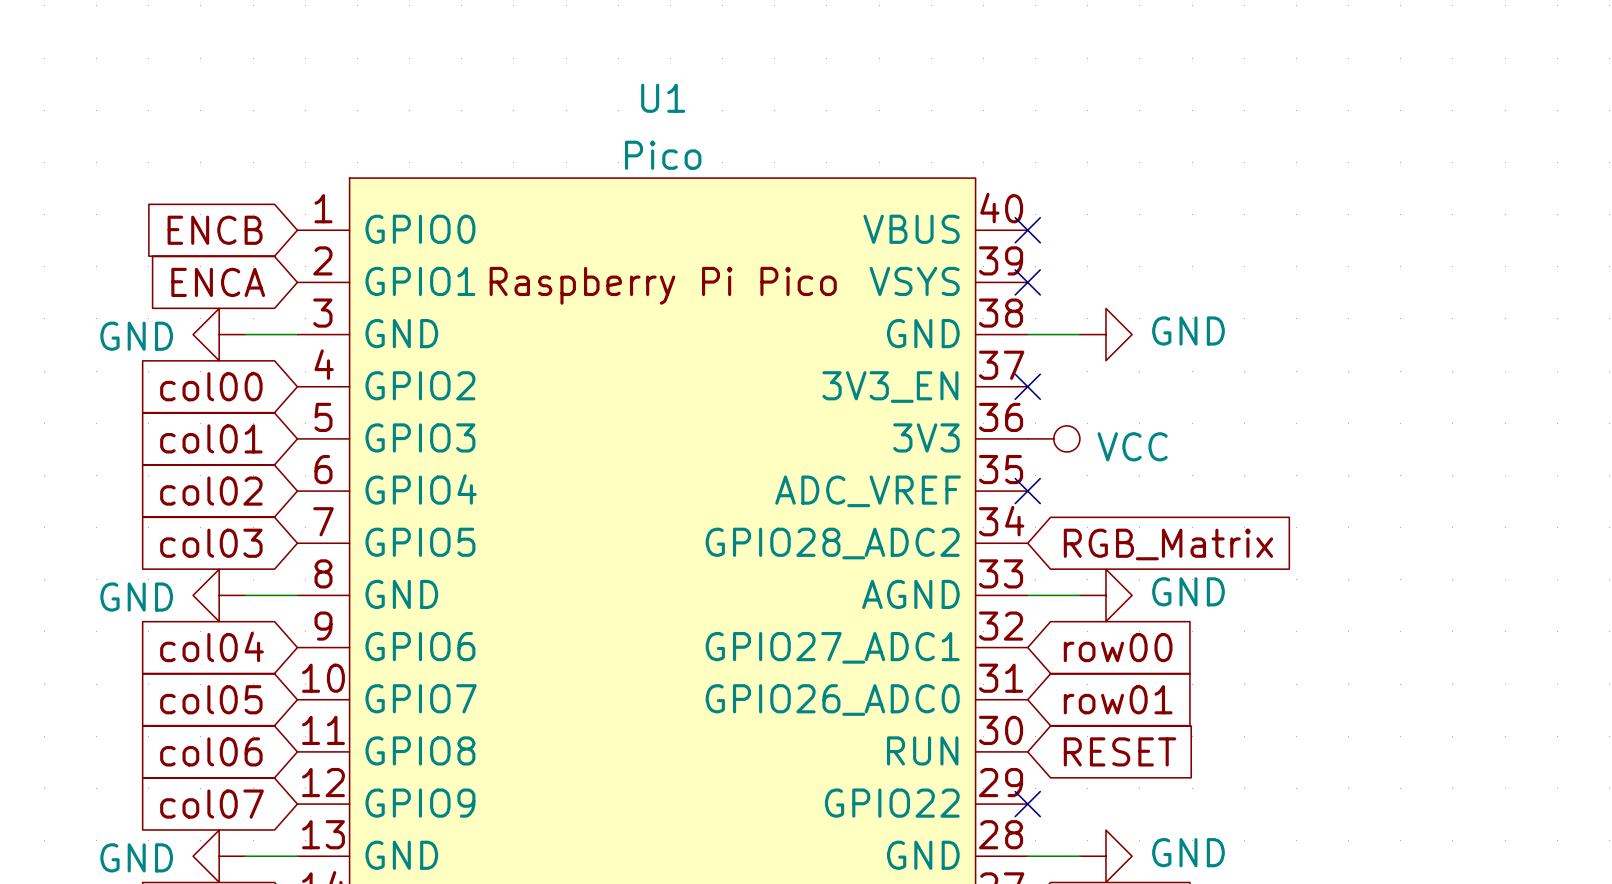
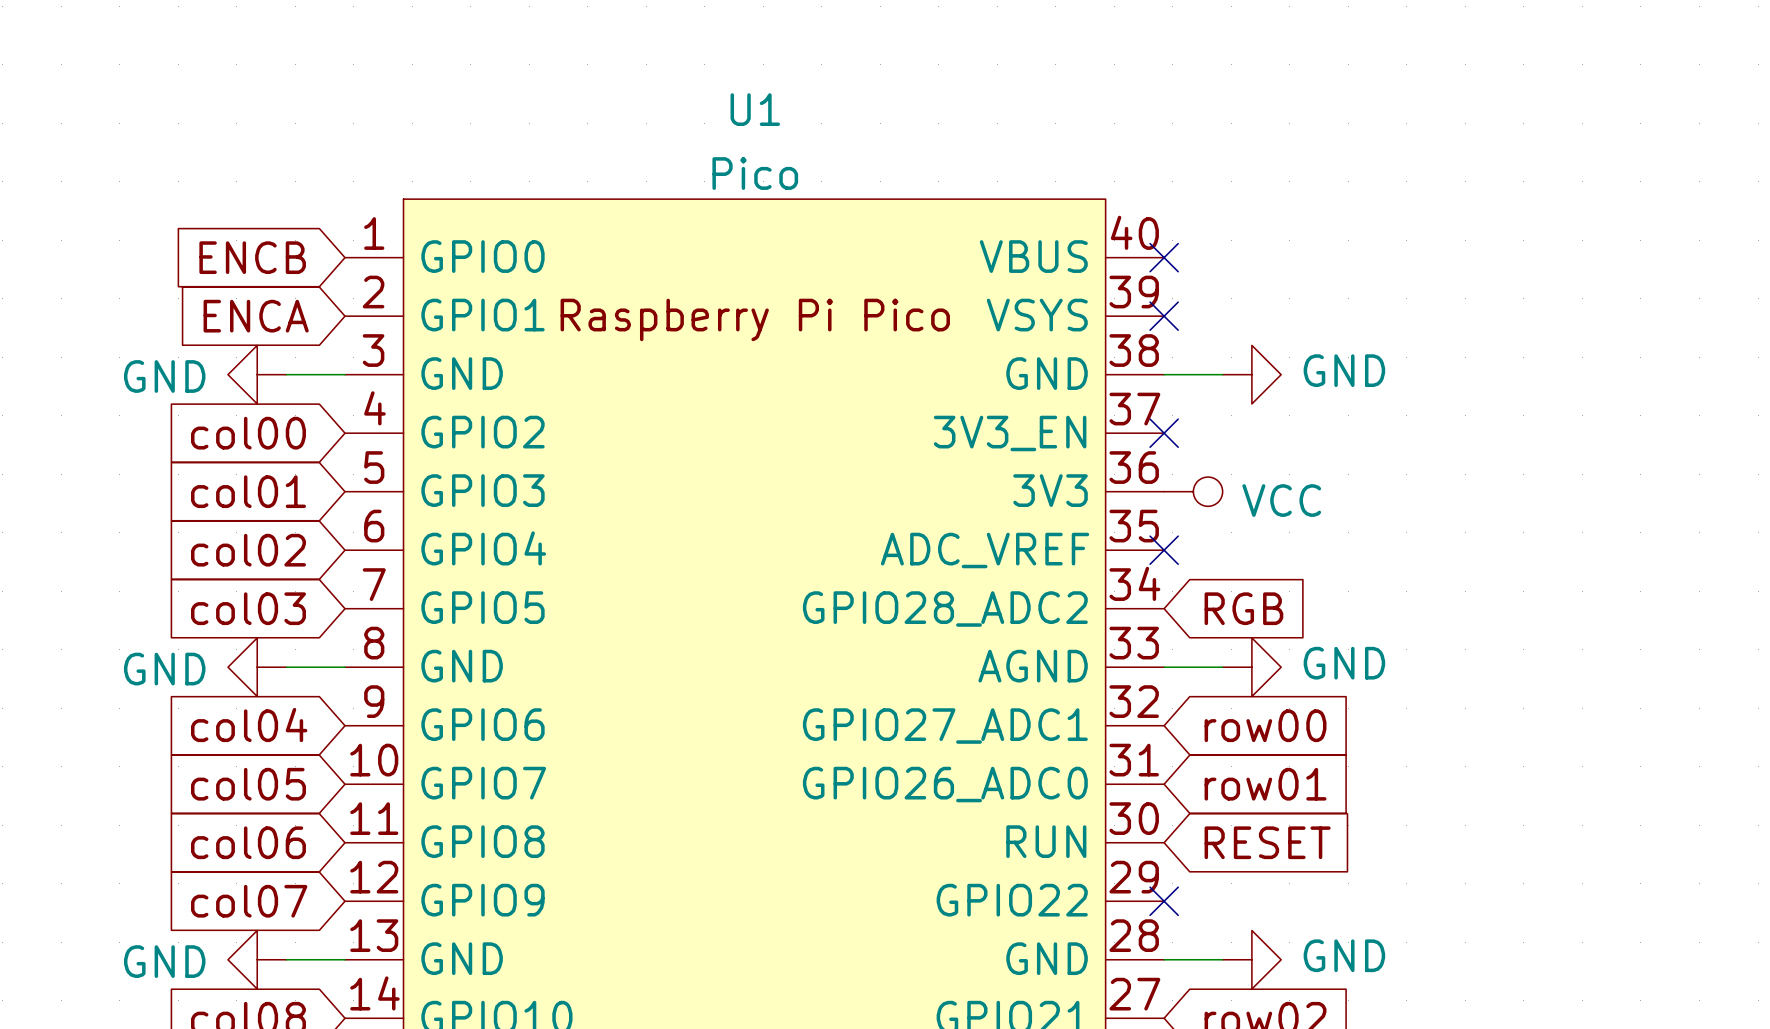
global label: RGB_Matrix (1168, 544) -> RGB (1243, 608)

